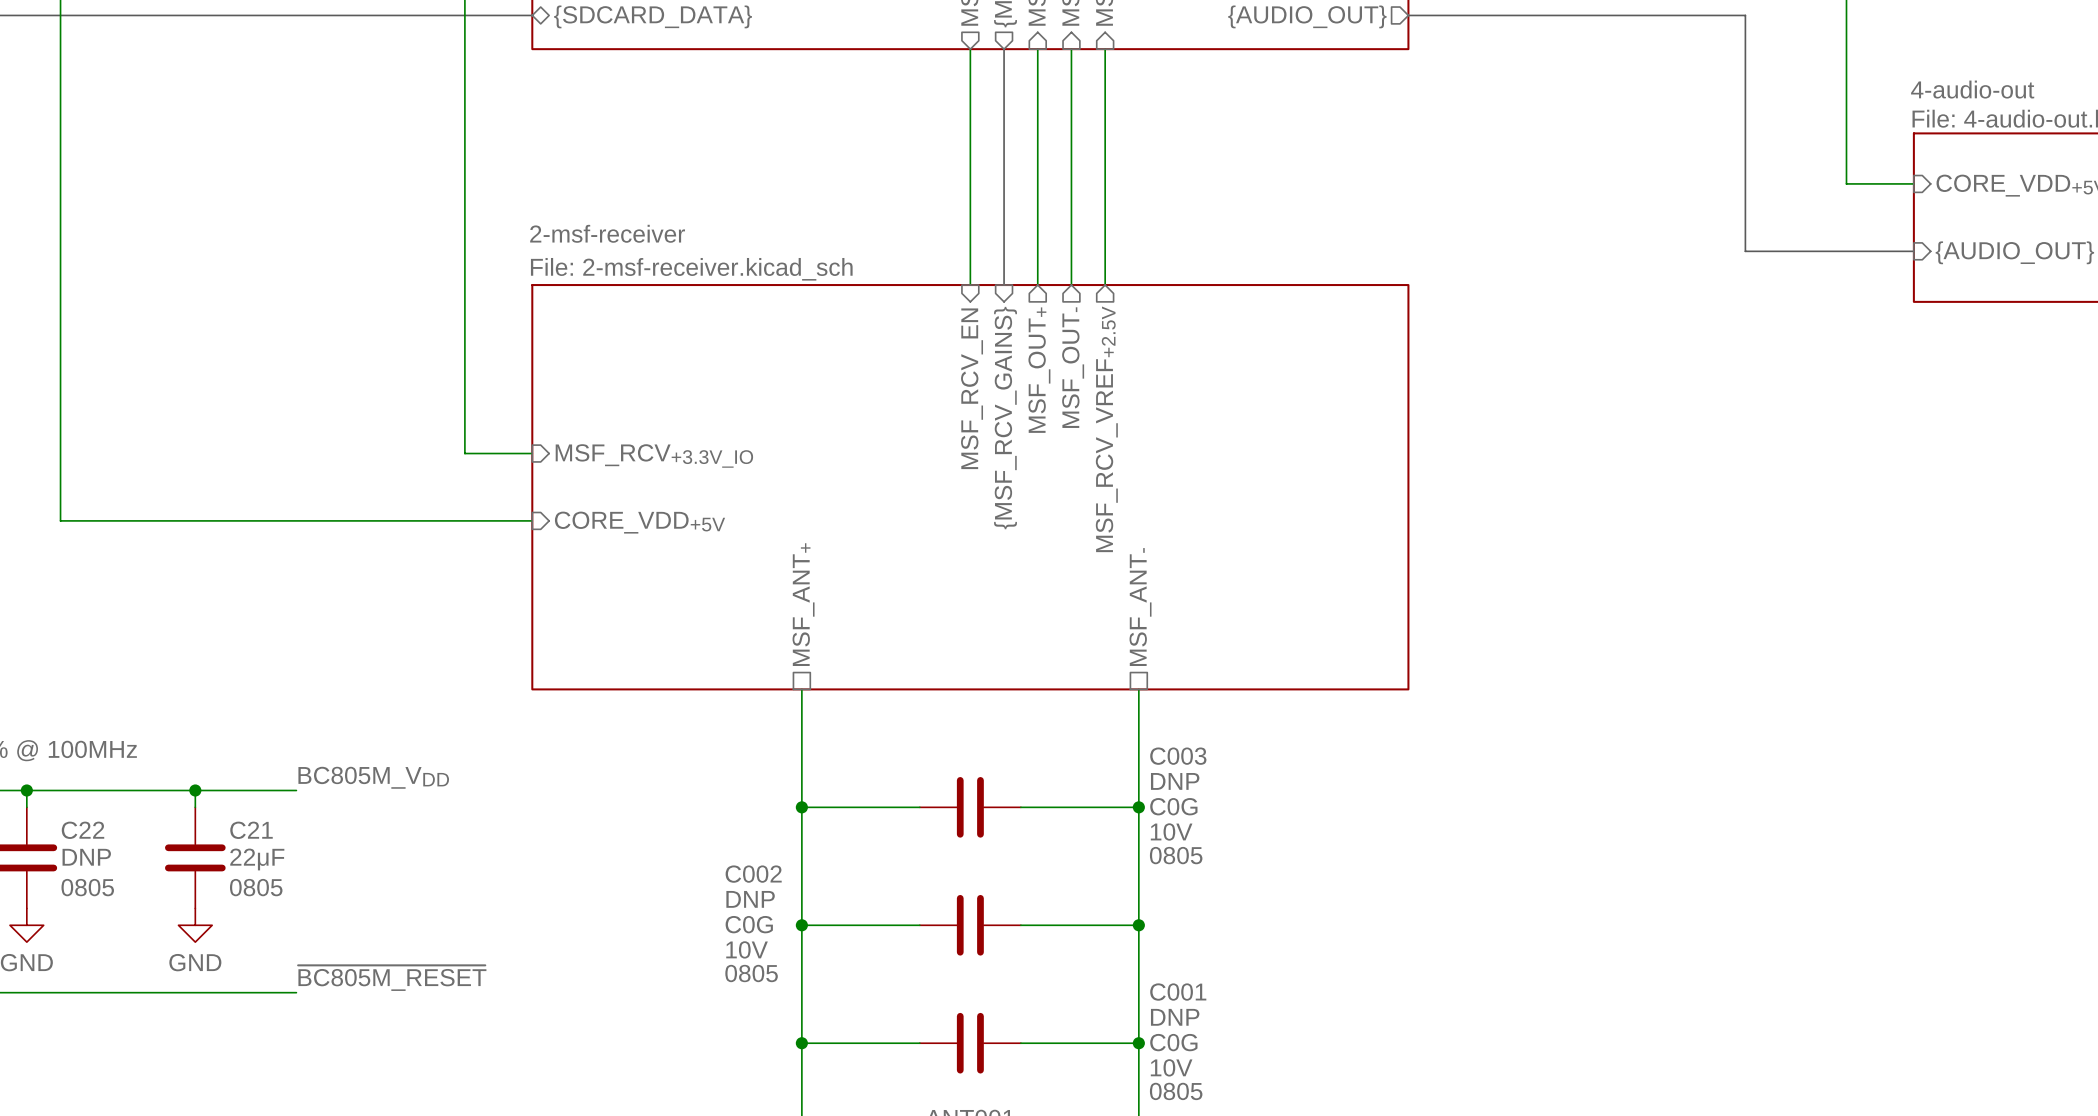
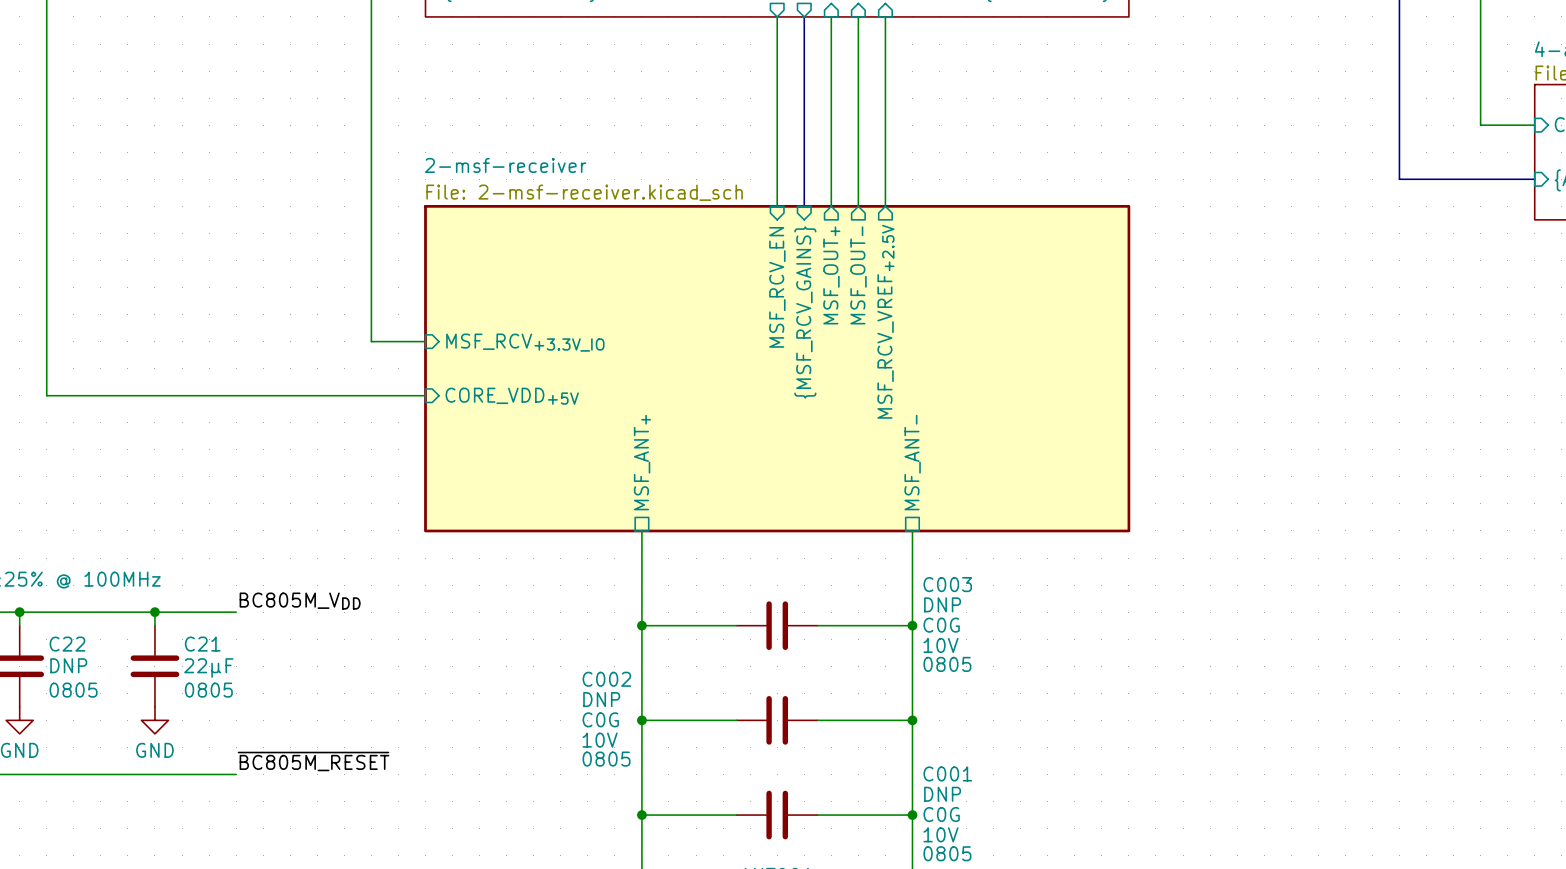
part: none -> (777, 368)

